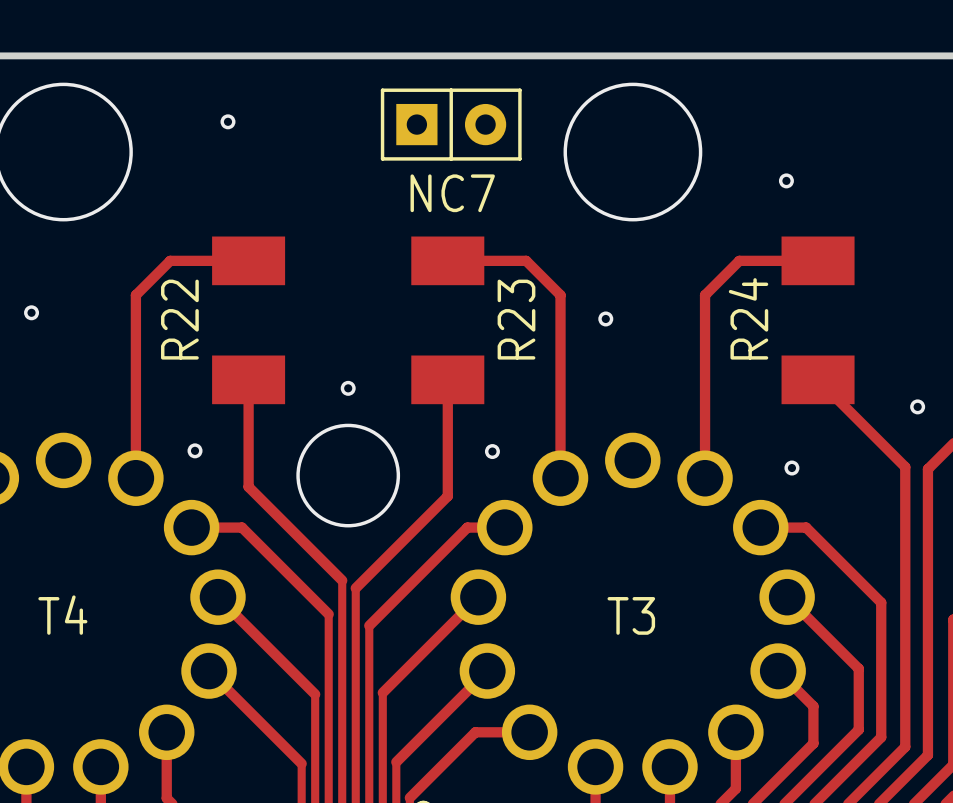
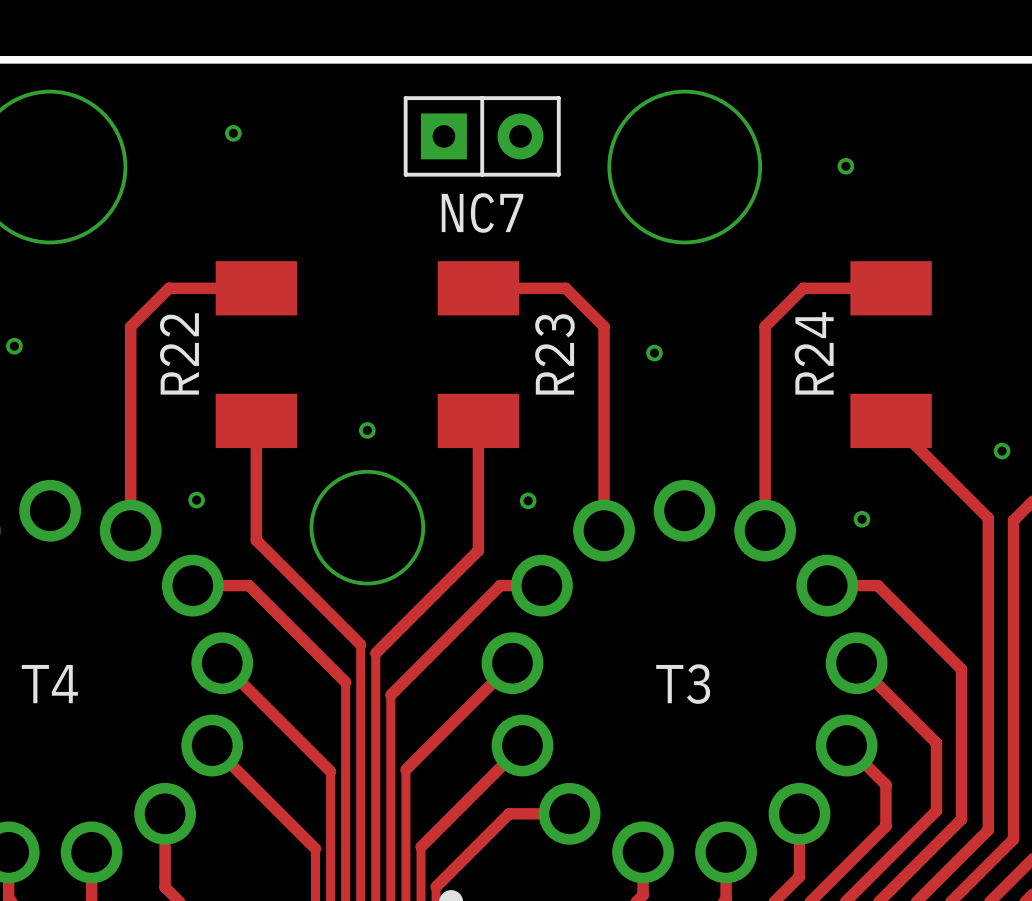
via position: (786, 180) -> (845, 166)

